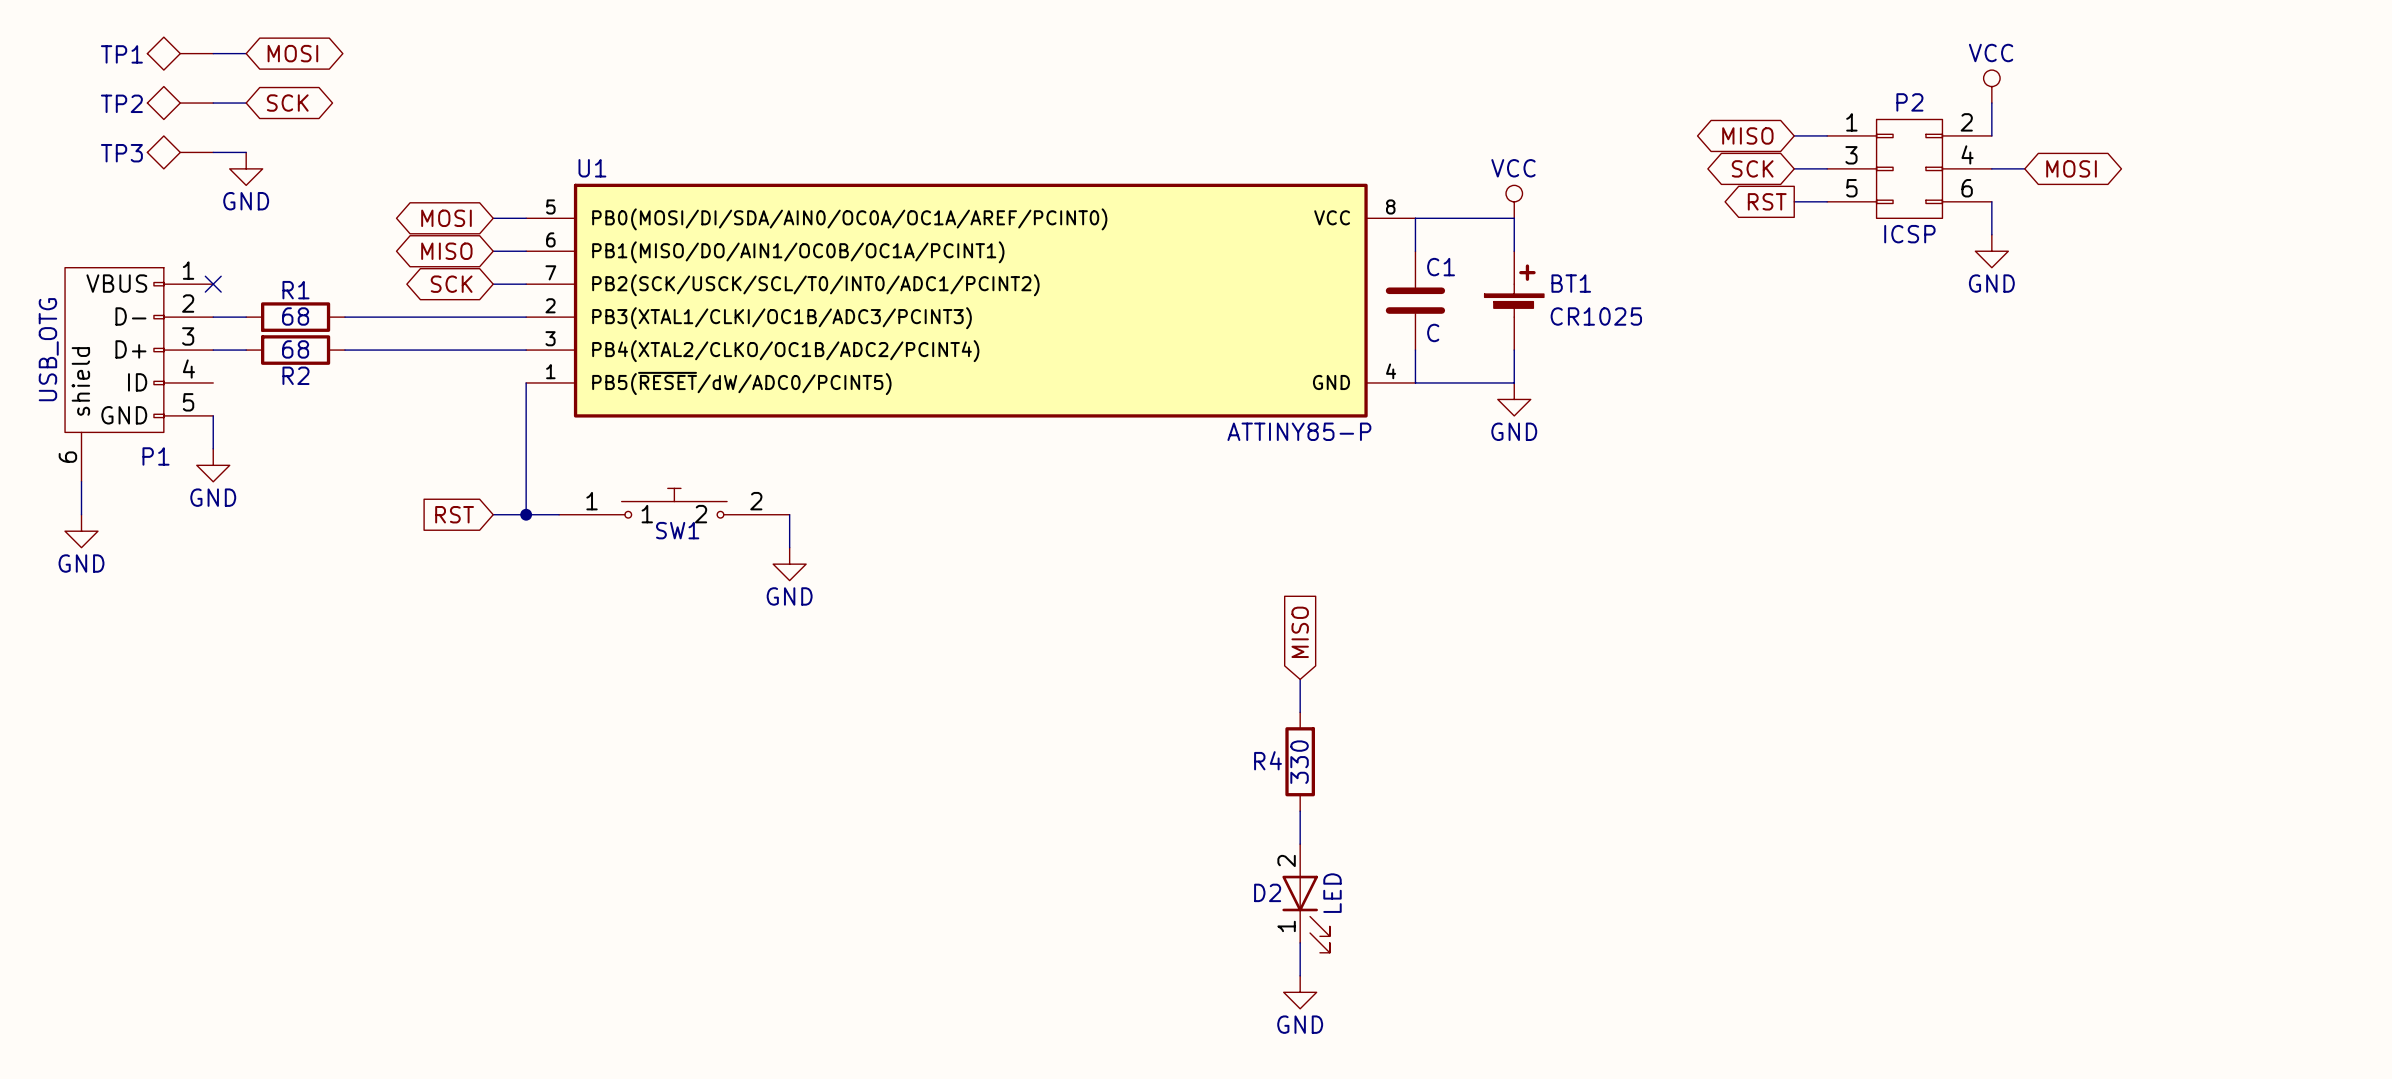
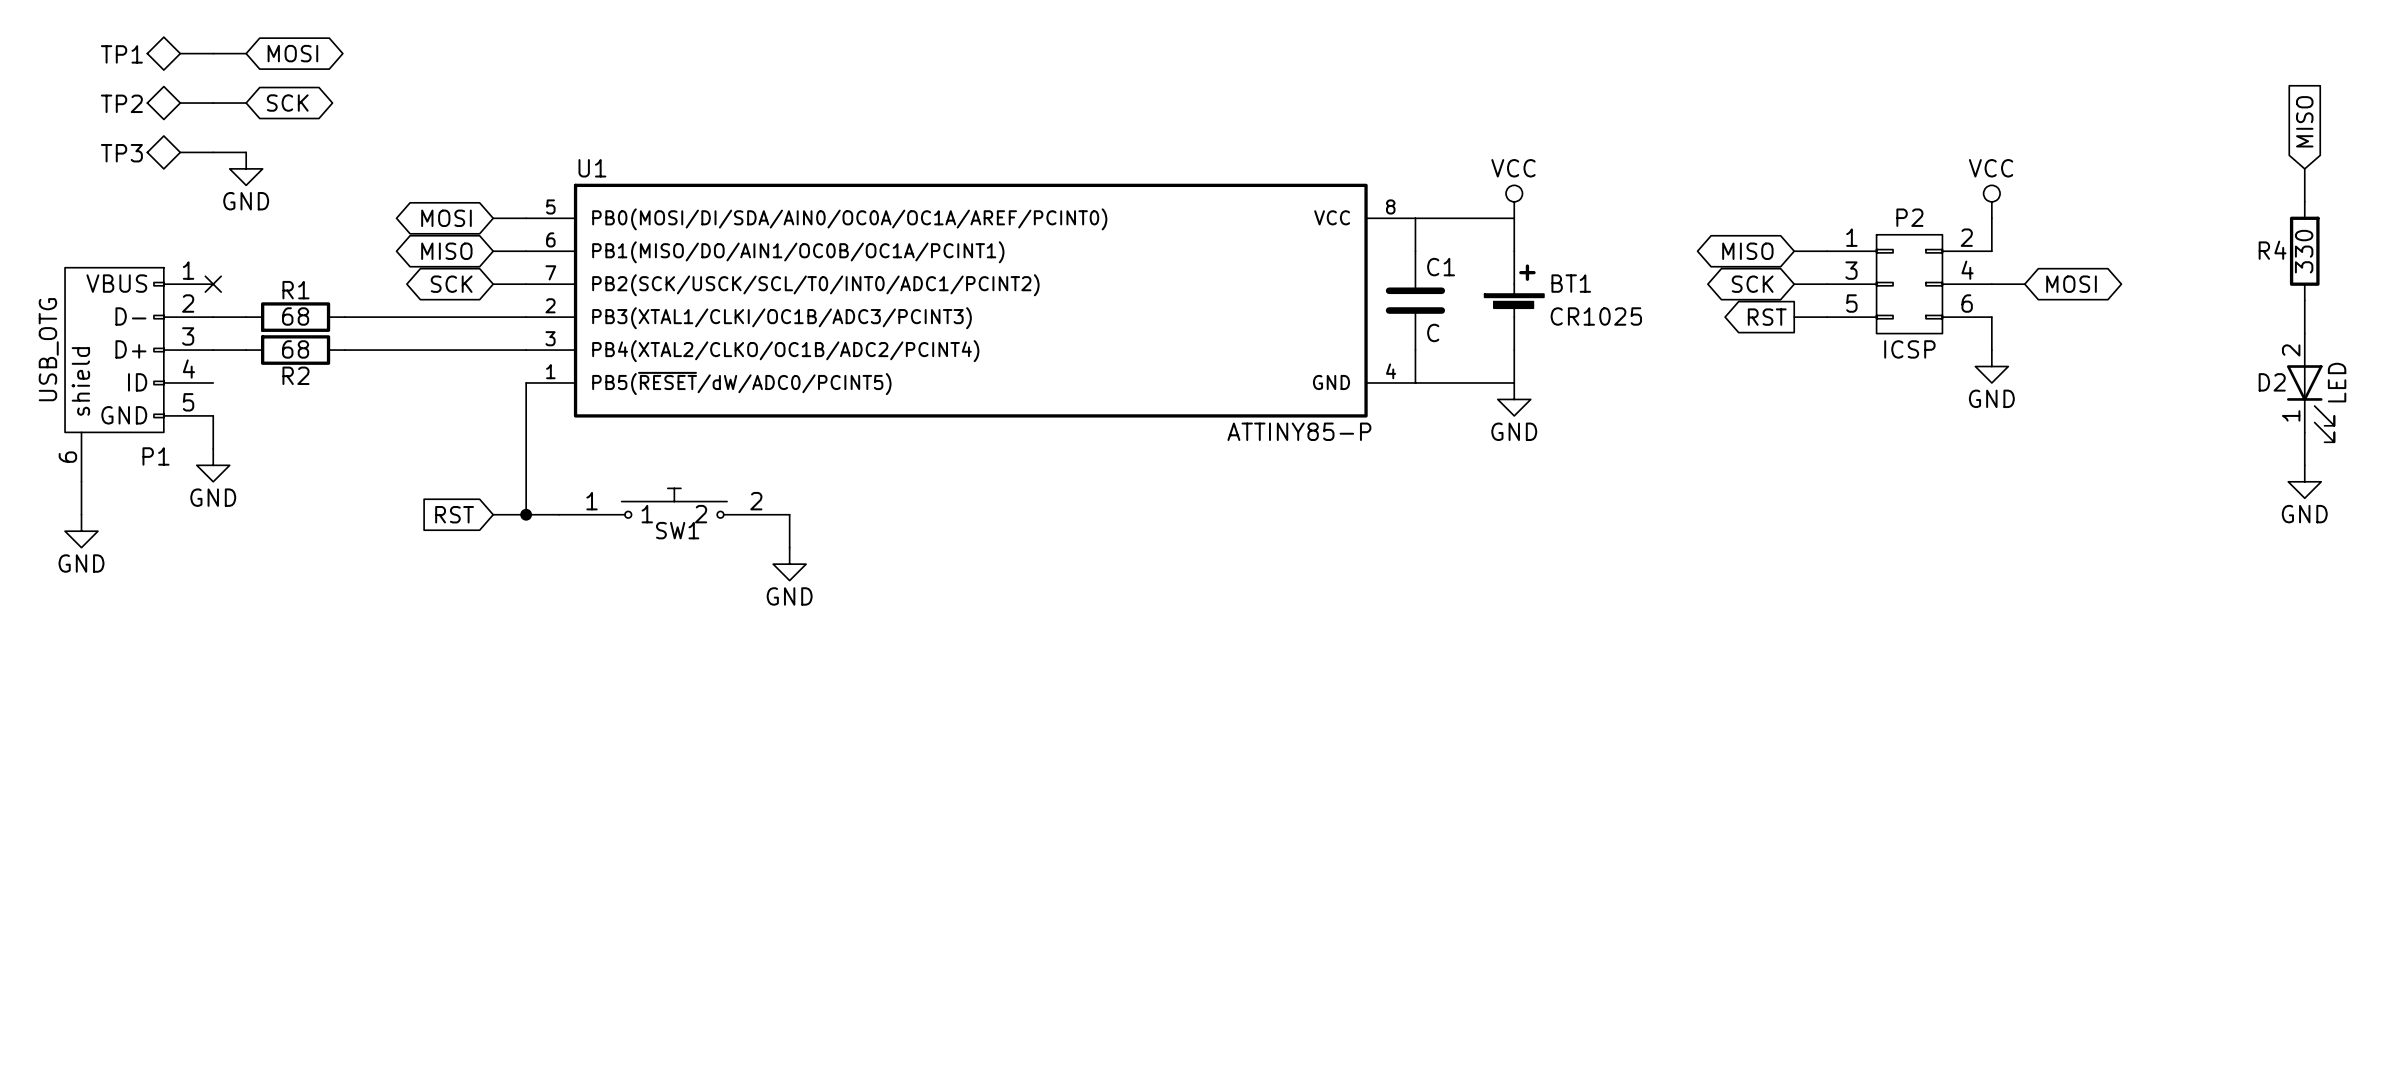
power symbol position: VCC (1991, 86) -> VCC (1991, 201)
wire: (1991, 103) (1991, 135) -> (1991, 317) (1991, 350)
global label: none -> MISO (2304, 121)
global label position: MISO (1747, 135) -> MISO (1747, 251)
wire: (1794, 135) (1827, 135) -> (1794, 251) (1827, 251)
global label position: SCK (1752, 168) -> SCK (1752, 284)
wire: (1794, 168) (1827, 168) -> (1794, 284) (1827, 284)
P2 position: (1909, 168) -> (1909, 284)
wire: (1991, 168) (2024, 168) -> (1991, 284) (2024, 284)
global label position: MOSI (2071, 168) -> MOSI (2071, 284)
wire: none -> (2304, 168) (2304, 201)
global label position: RST (1767, 201) -> RST (1767, 317)
wire: (1794, 201) (1827, 201) -> (1794, 317) (1827, 317)
power symbol position: GND (1991, 251) -> GND (1991, 366)
wire: none -> (2304, 300) (2304, 333)
wire: none -> (2304, 432) (2304, 465)
power symbol: none -> GND (2304, 481)
global label: MISO (1300, 632) -> none
wire: (1300, 679) (1300, 712) -> none
R4 position: (1300, 761) -> (2304, 251)
wire: (1300, 811) (1300, 844) -> none
D2 position: (1306, 898) -> (2310, 387)
wire: (1300, 942) (1300, 975) -> none
power symbol: GND (1300, 992) -> none

